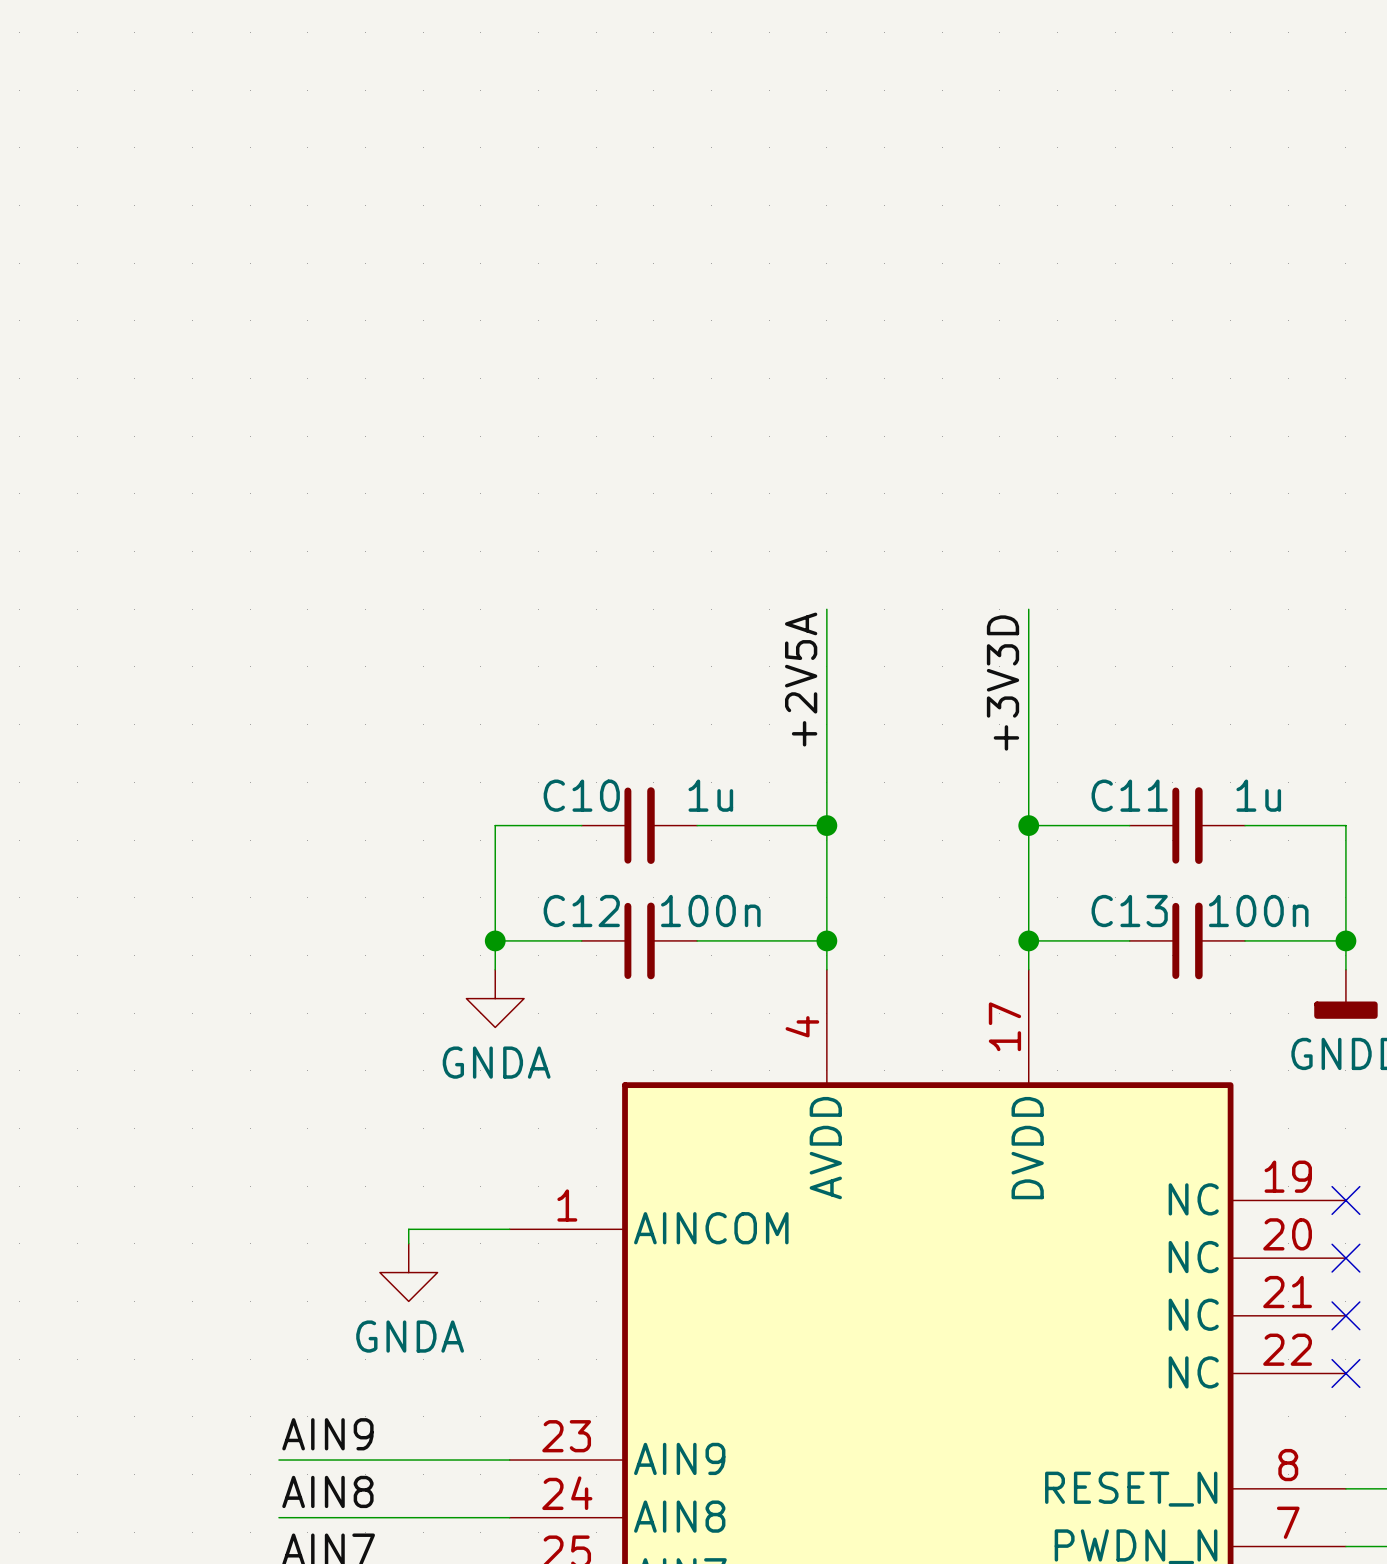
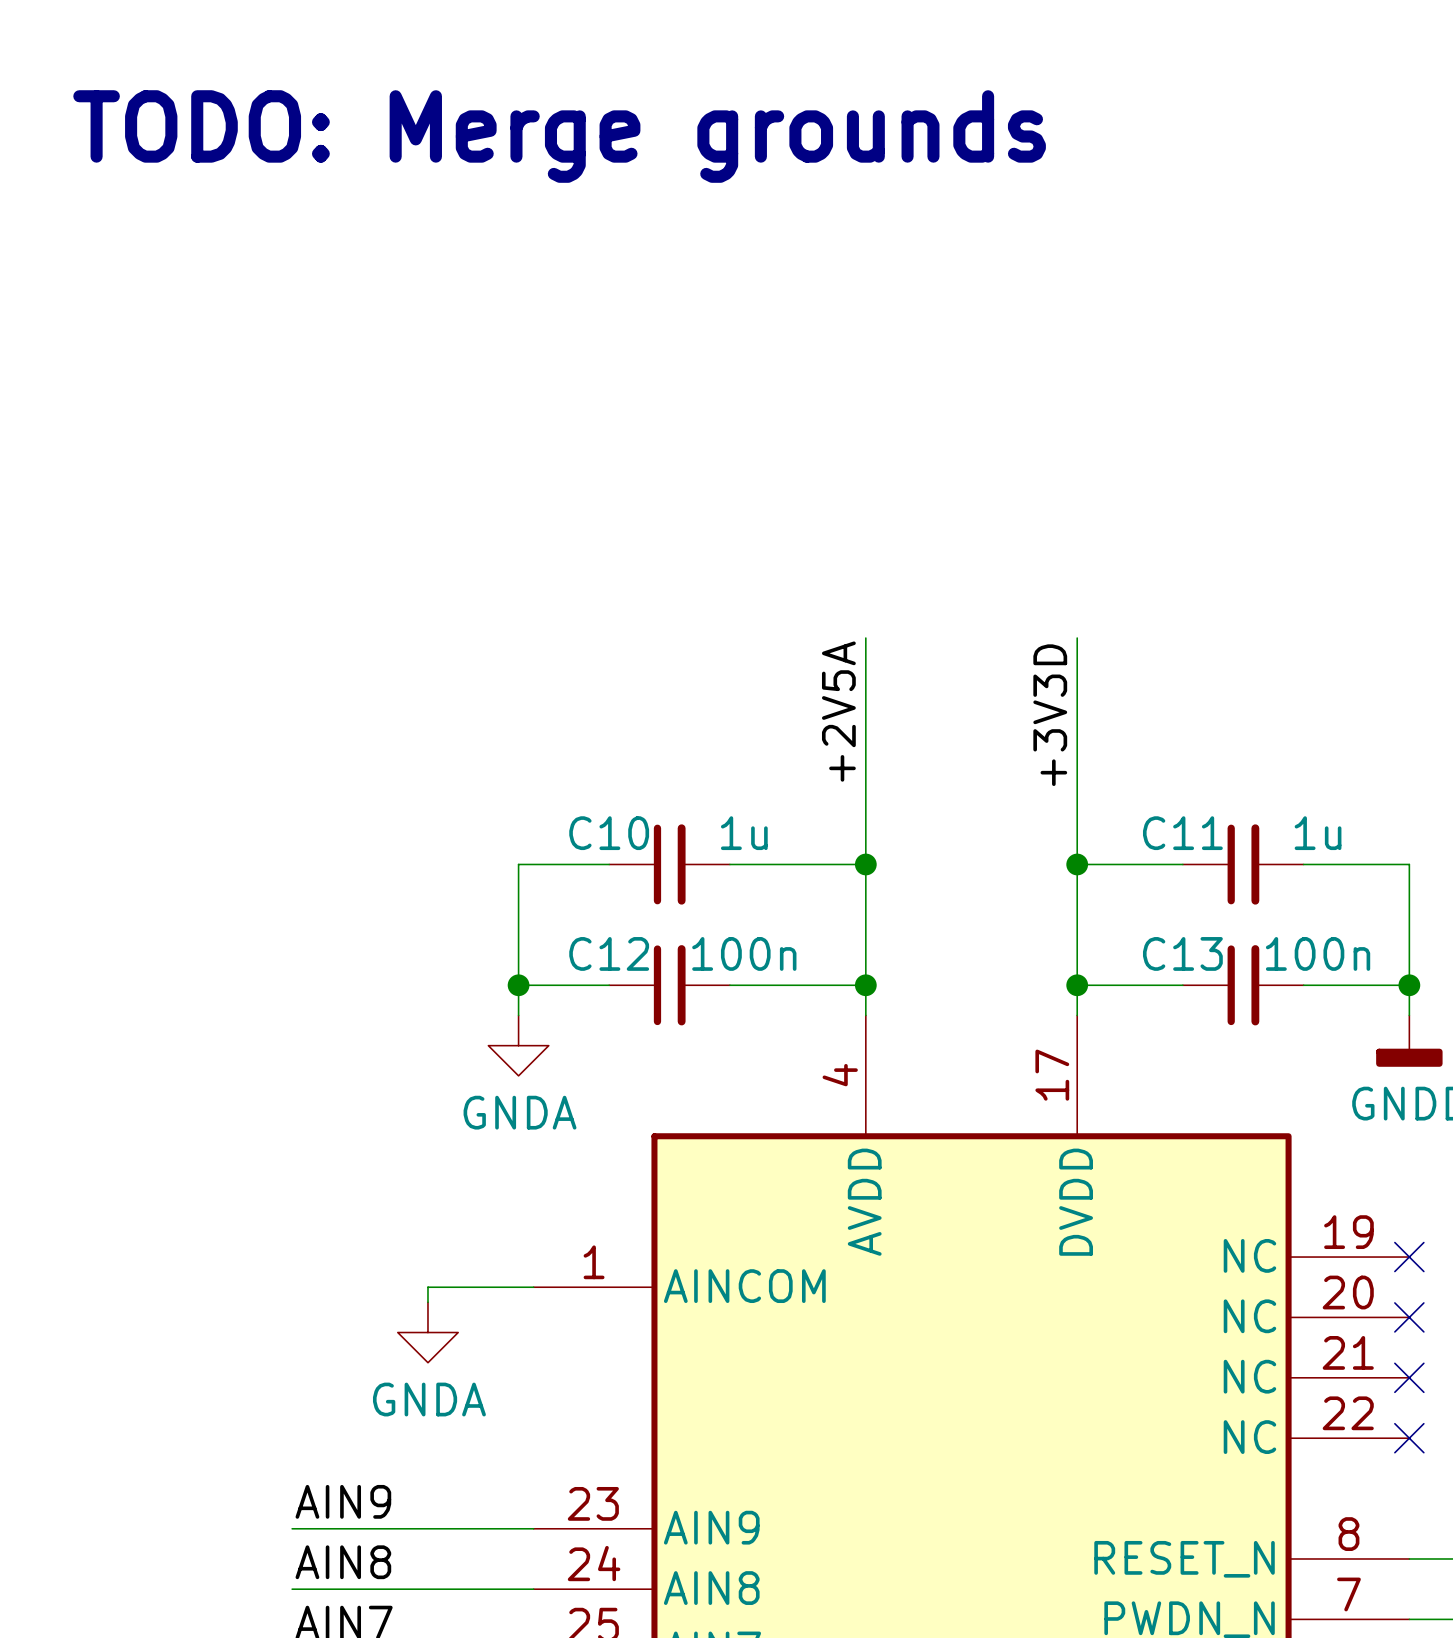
text: none -> TODO: Merge grounds (559, 136)

